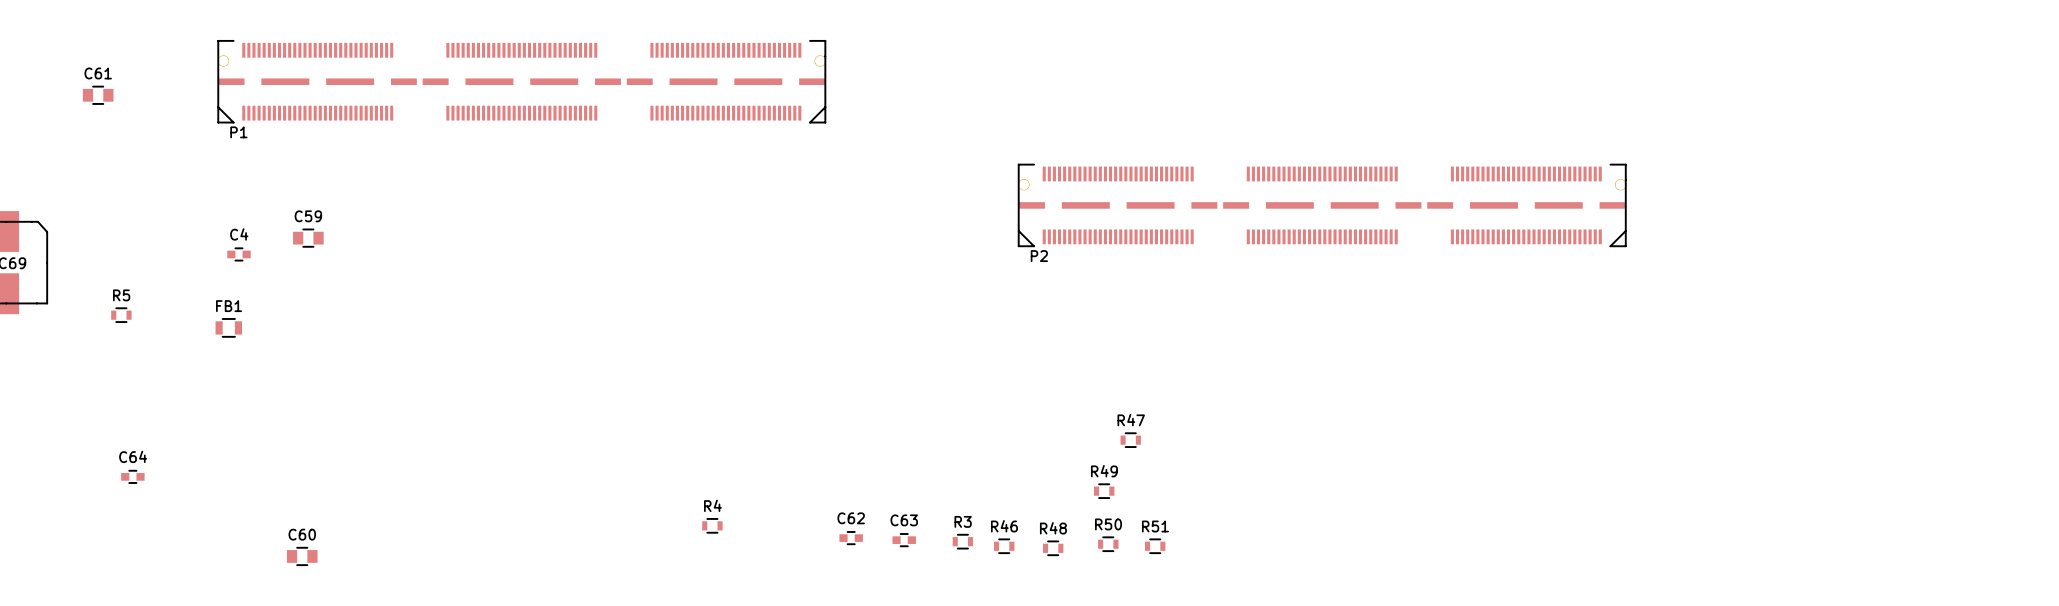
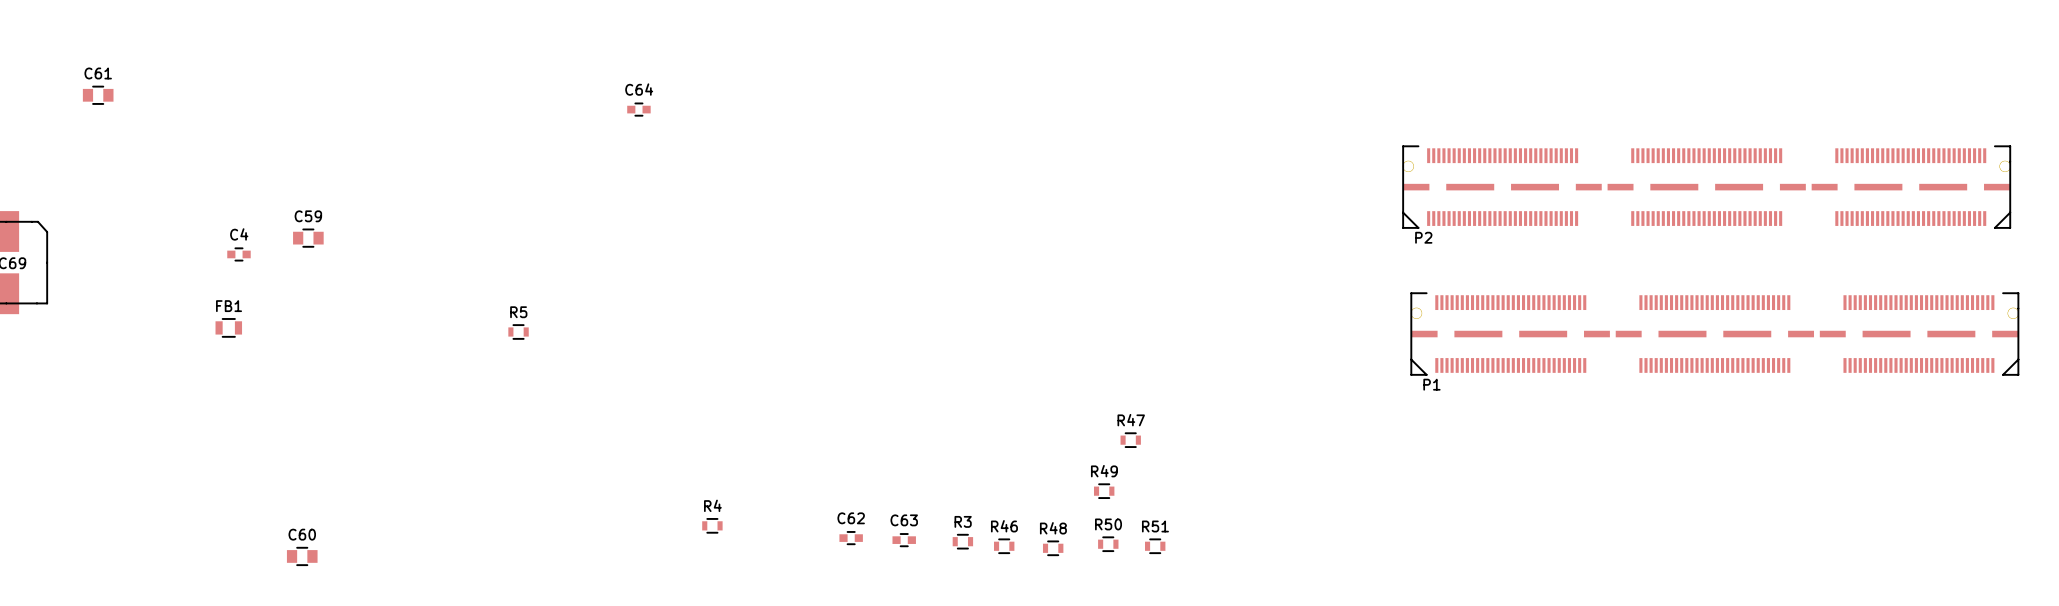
P1 position: (521, 81) -> (1714, 334)
P2 position: (1322, 205) -> (1706, 187)
R5 position: (121, 315) -> (518, 331)
C64 position: (132, 476) -> (638, 109)

